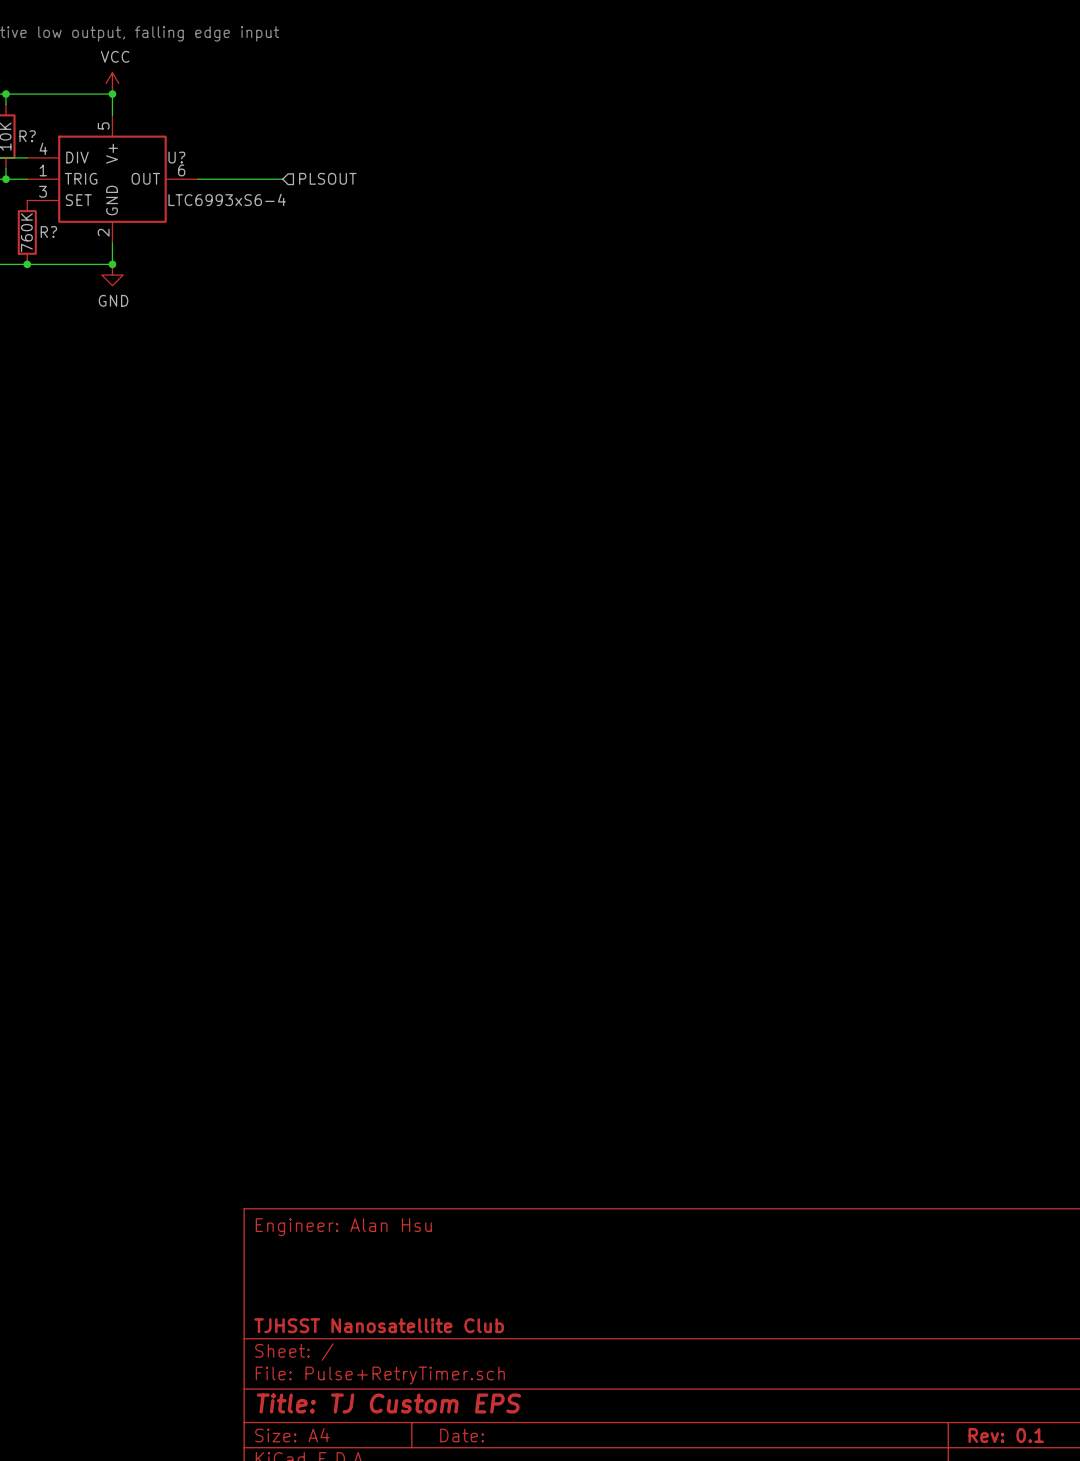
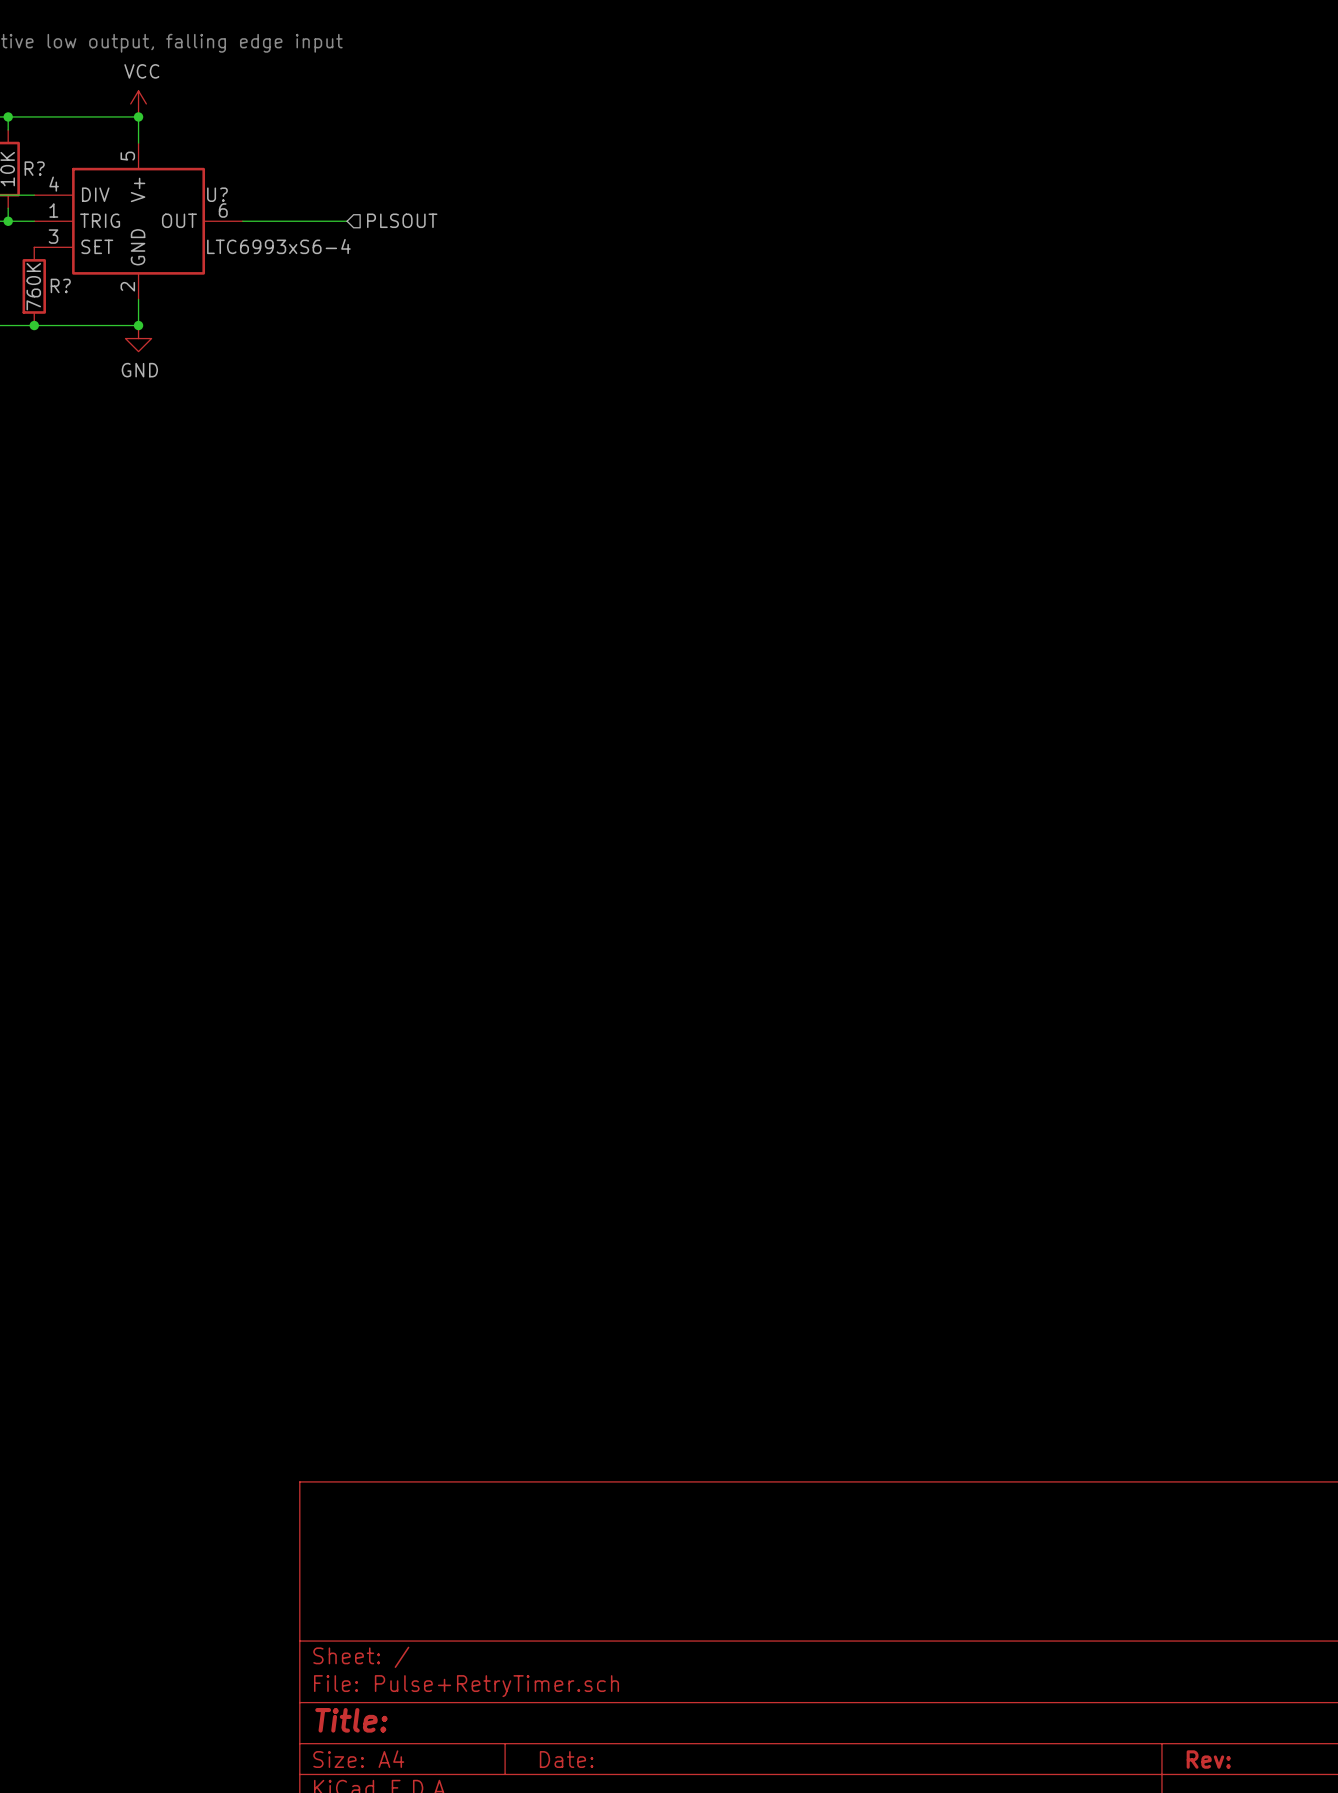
title block: Engineer: Alan Hsu (343, 1227) -> none
title block: TJHSST Nanosatellite Club (379, 1325) -> none
title block: Title: TJ Custom EPS (388, 1403) -> Title: (351, 1720)
title block: Rev: 0.1 (1006, 1435) -> Rev: (1208, 1759)

